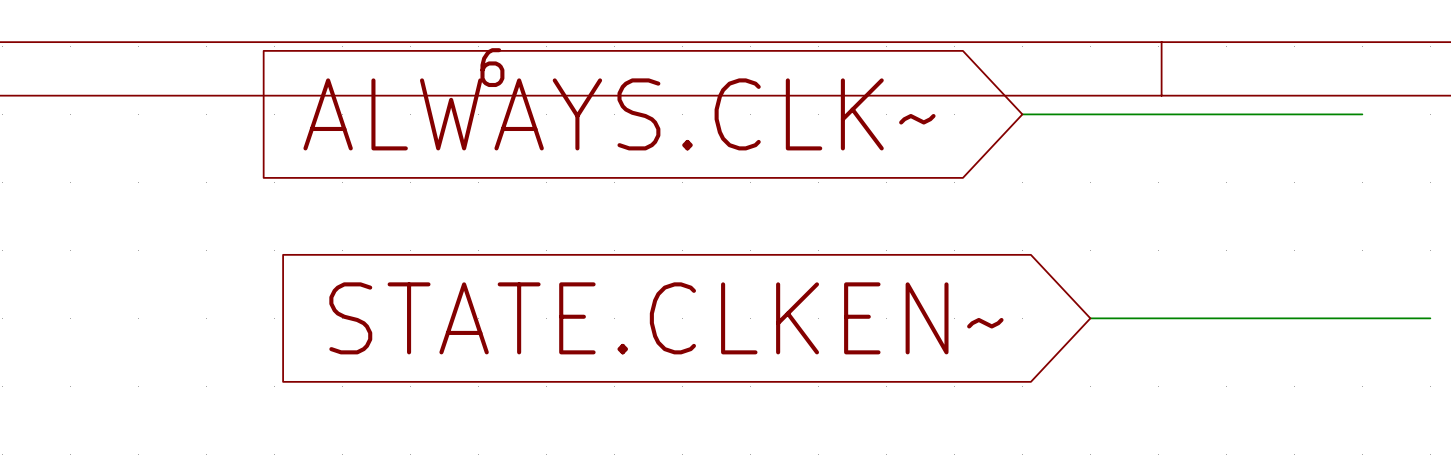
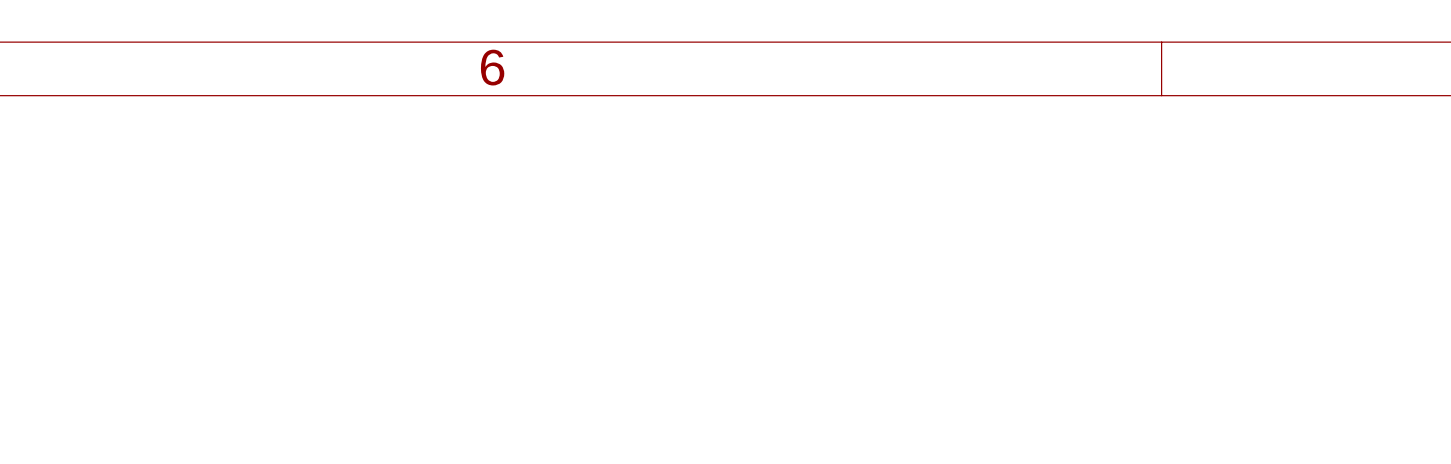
global label: ALWAYS.CLK~ (619, 114) -> none
wire: (1022, 114) (1362, 114) -> none
global label: STATE.CLKEN~ (666, 318) -> none
wire: (1090, 318) (1430, 318) -> none

